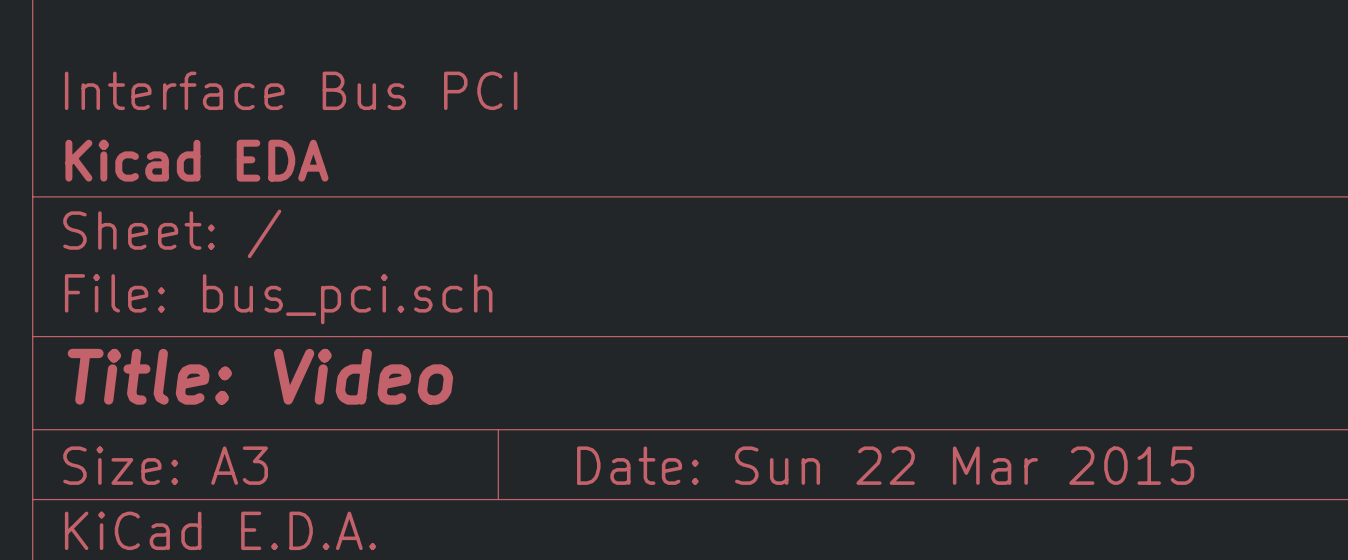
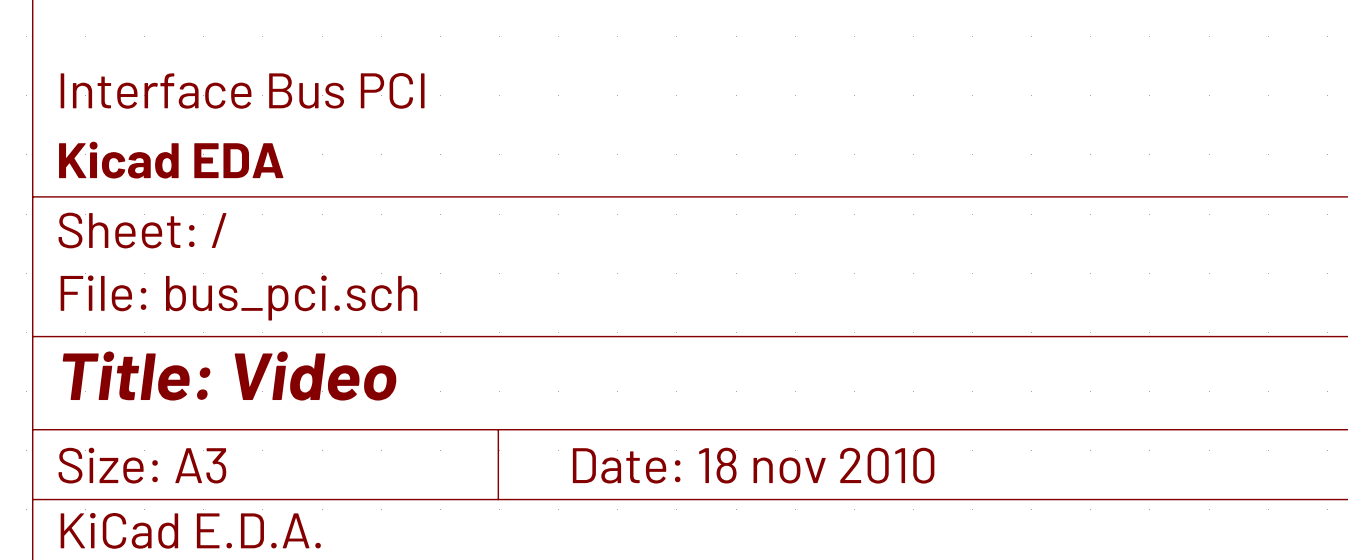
title block: Date: Sun 22 Mar 2015 (885, 465) -> Date: 18 nov 2010 (753, 465)

